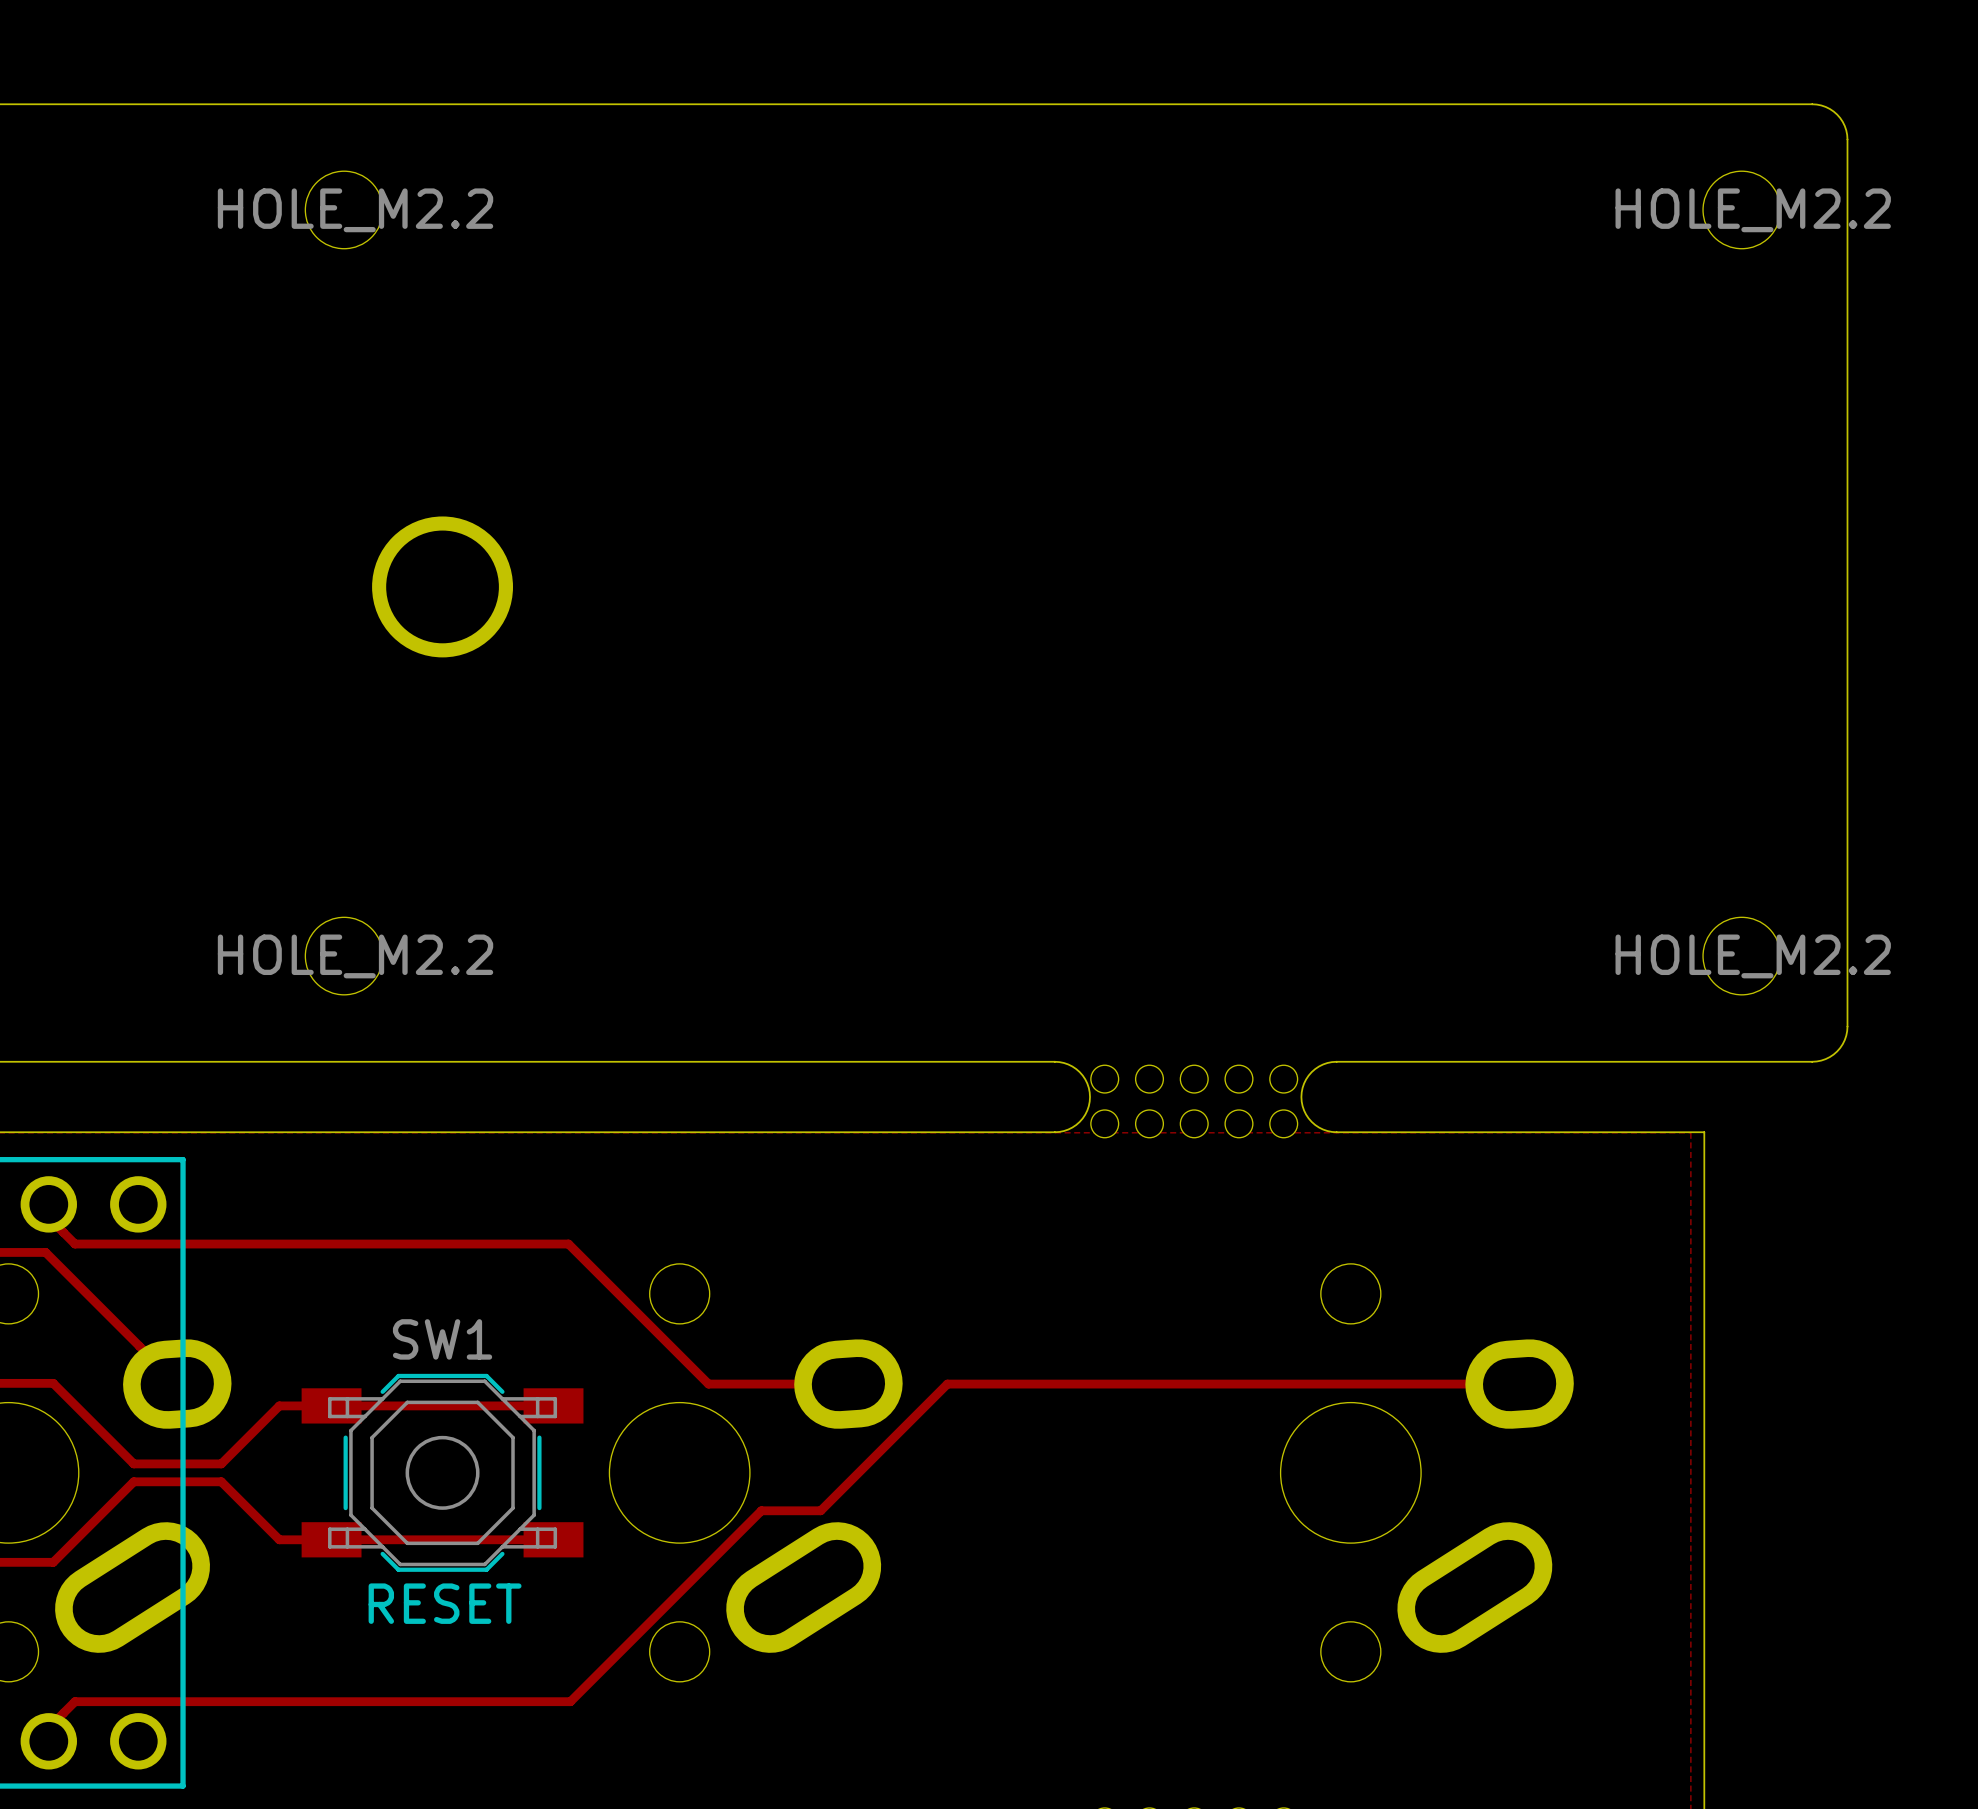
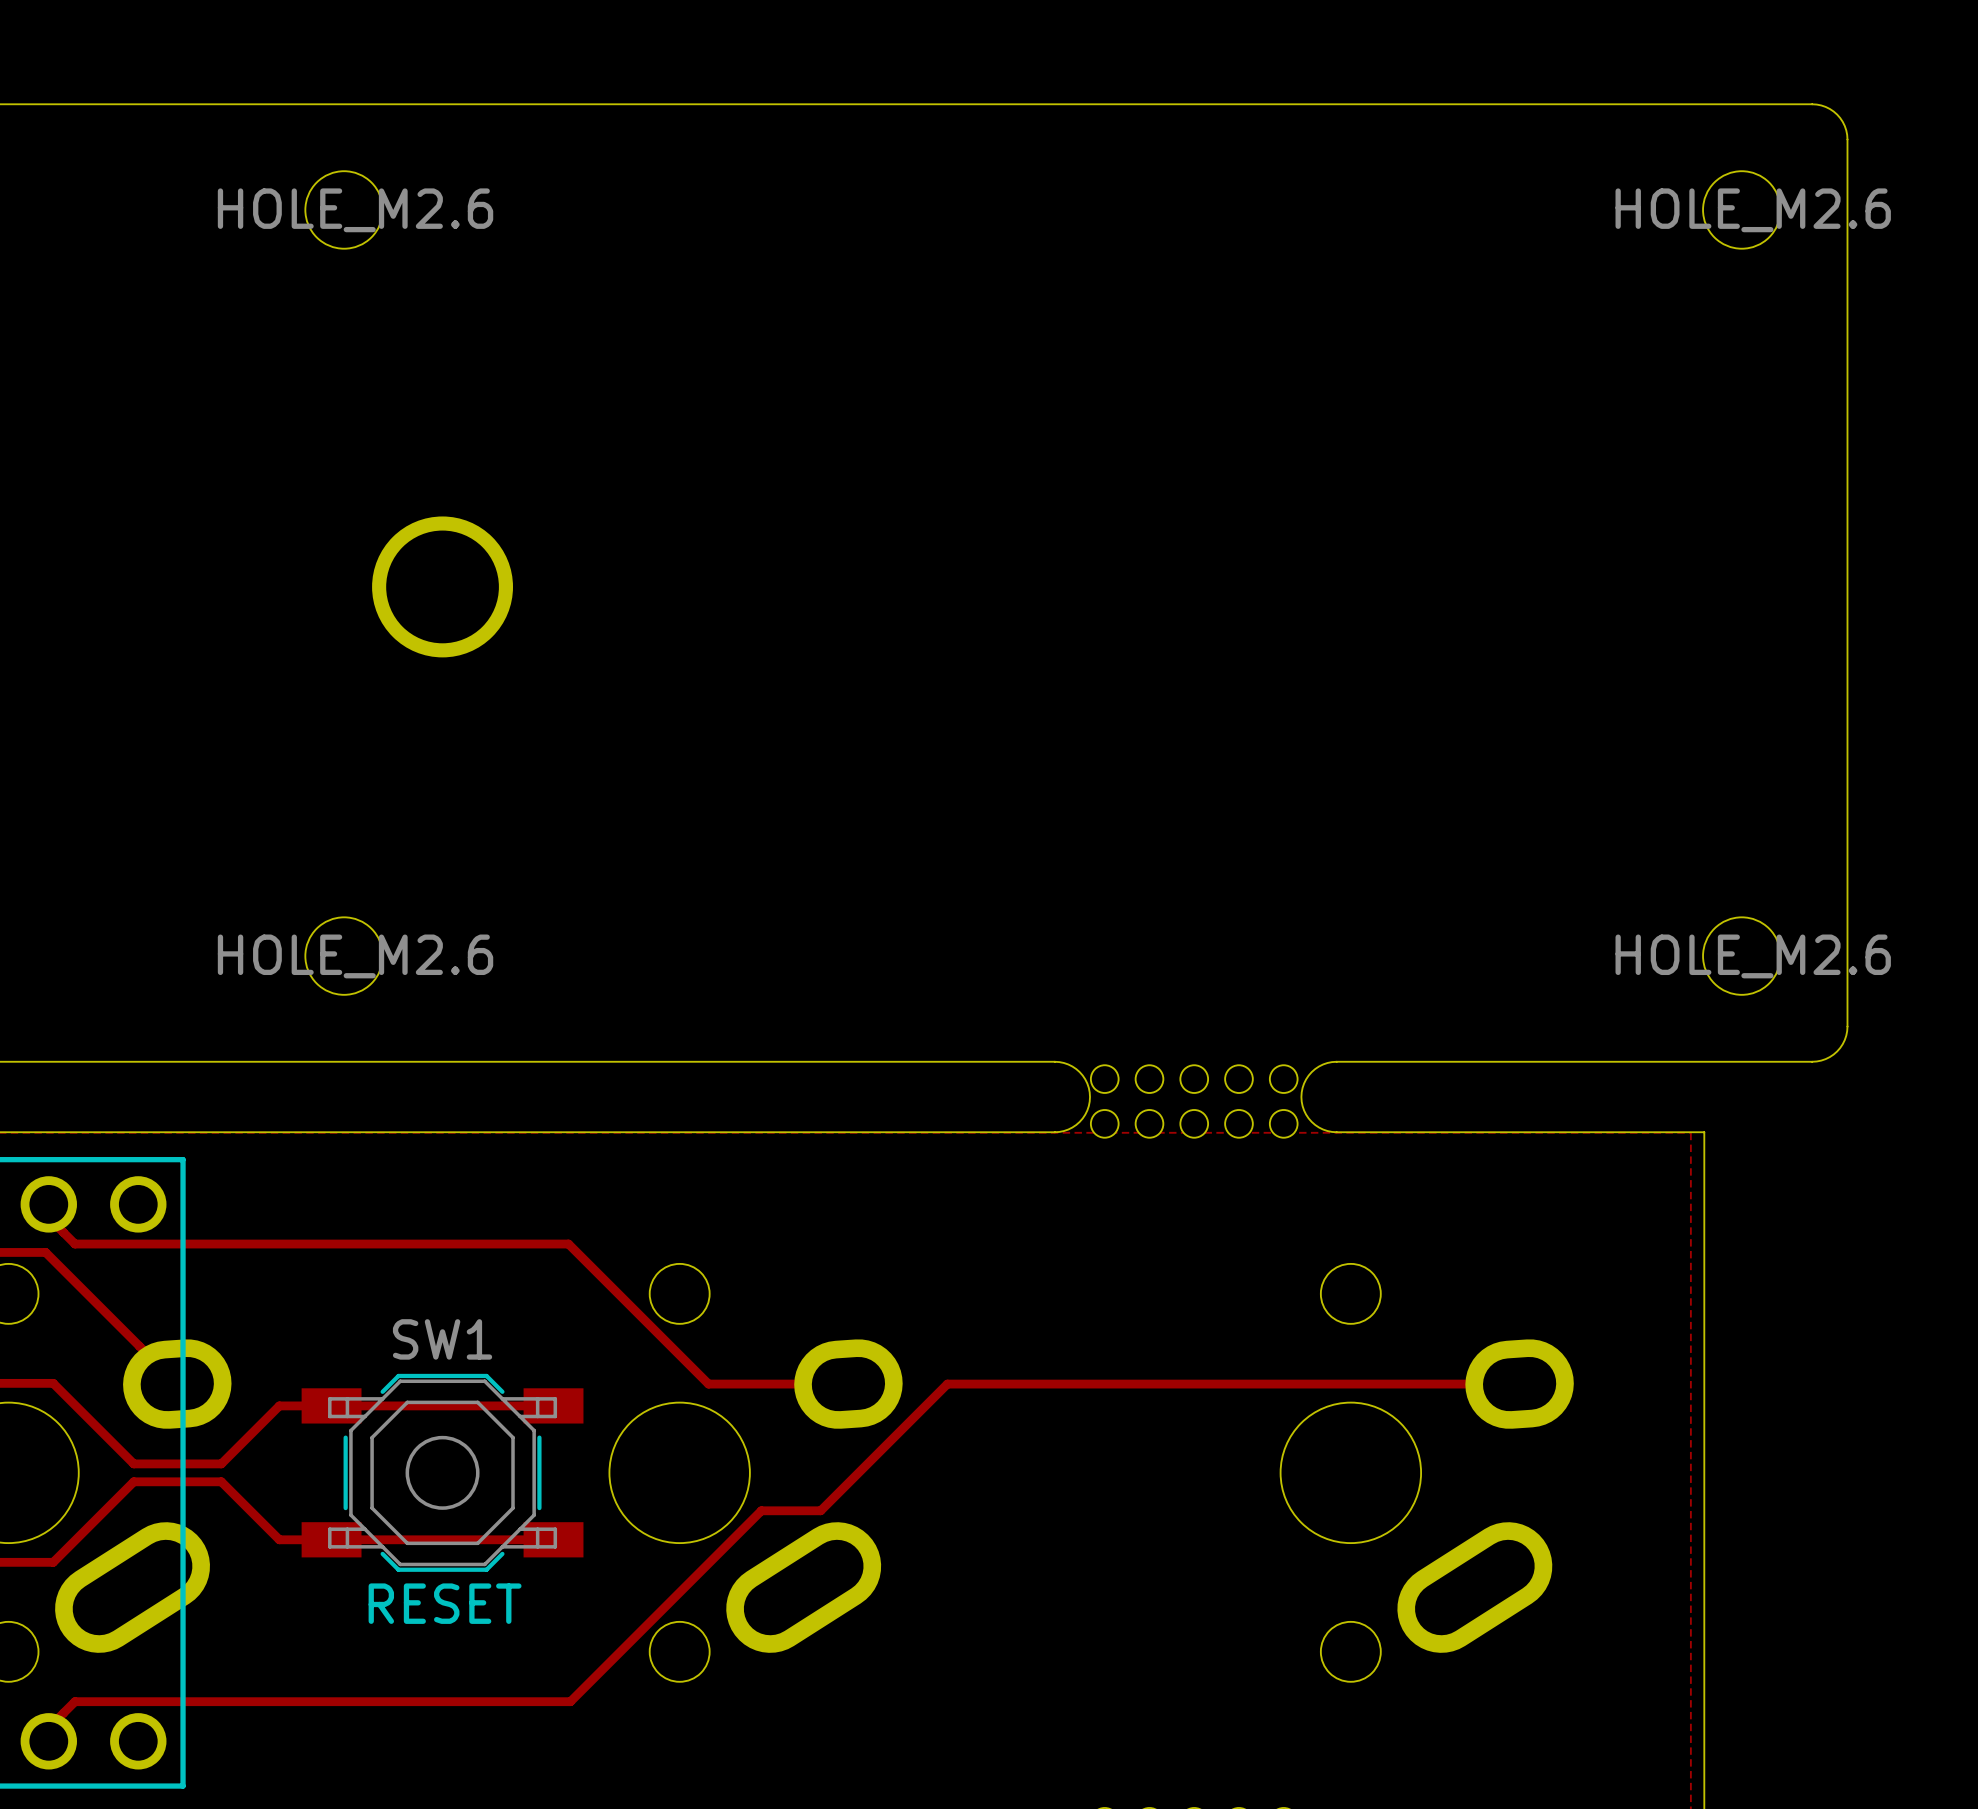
HOLE_M2.2 name: HOLE_M2.2 (355, 210) -> HOLE_M2.6 (355, 210)
HOLE_M2.2 name: HOLE_M2.2 (1753, 210) -> HOLE_M2.6 (1753, 210)
HOLE_M2.2 name: HOLE_M2.2 (355, 956) -> HOLE_M2.6 (355, 956)
HOLE_M2.2 name: HOLE_M2.2 (1753, 956) -> HOLE_M2.6 (1753, 956)

